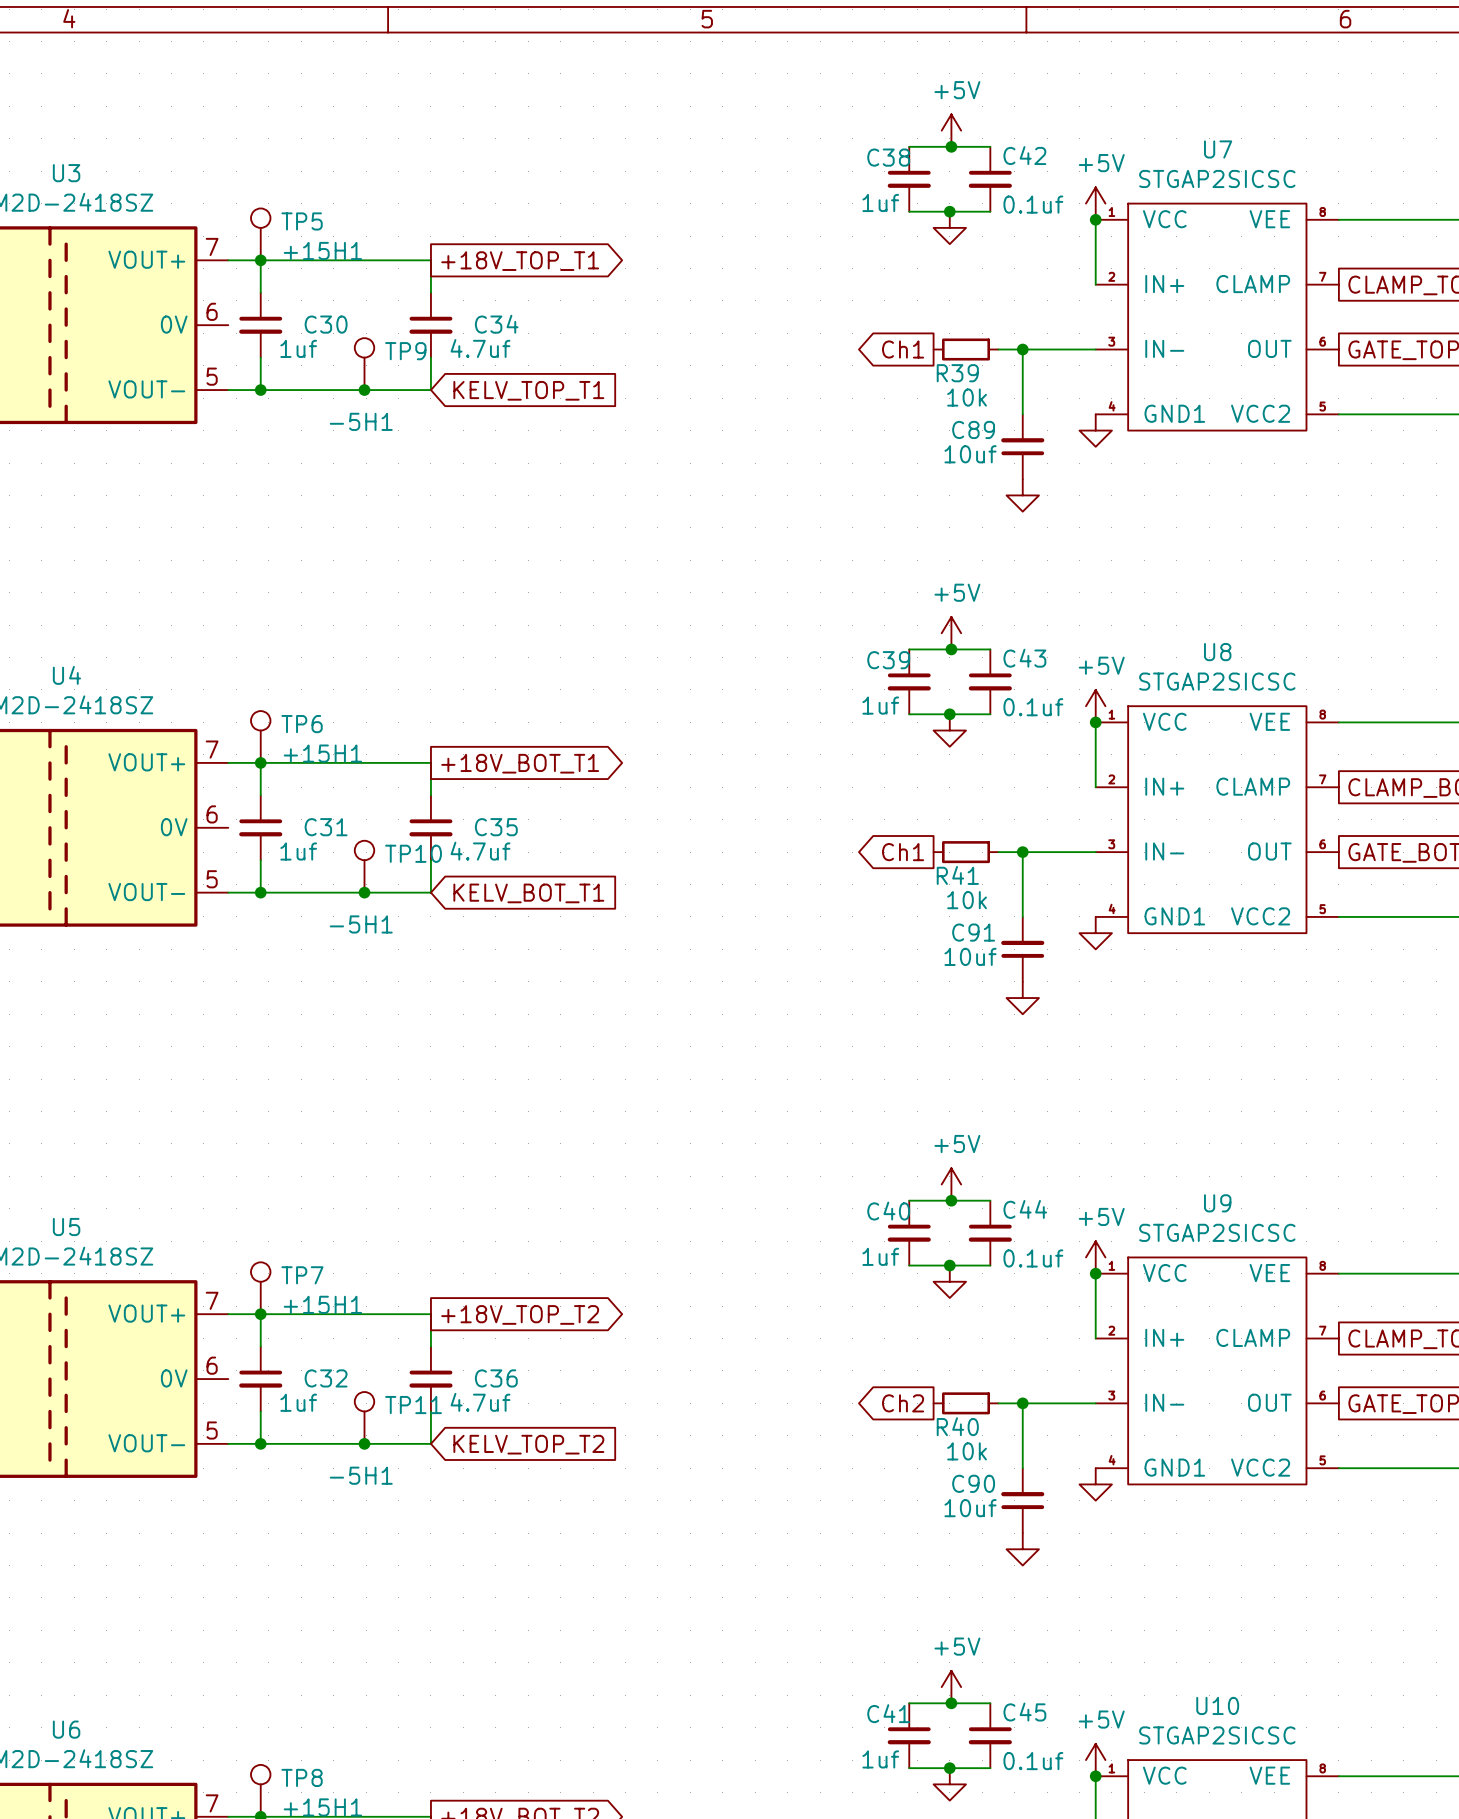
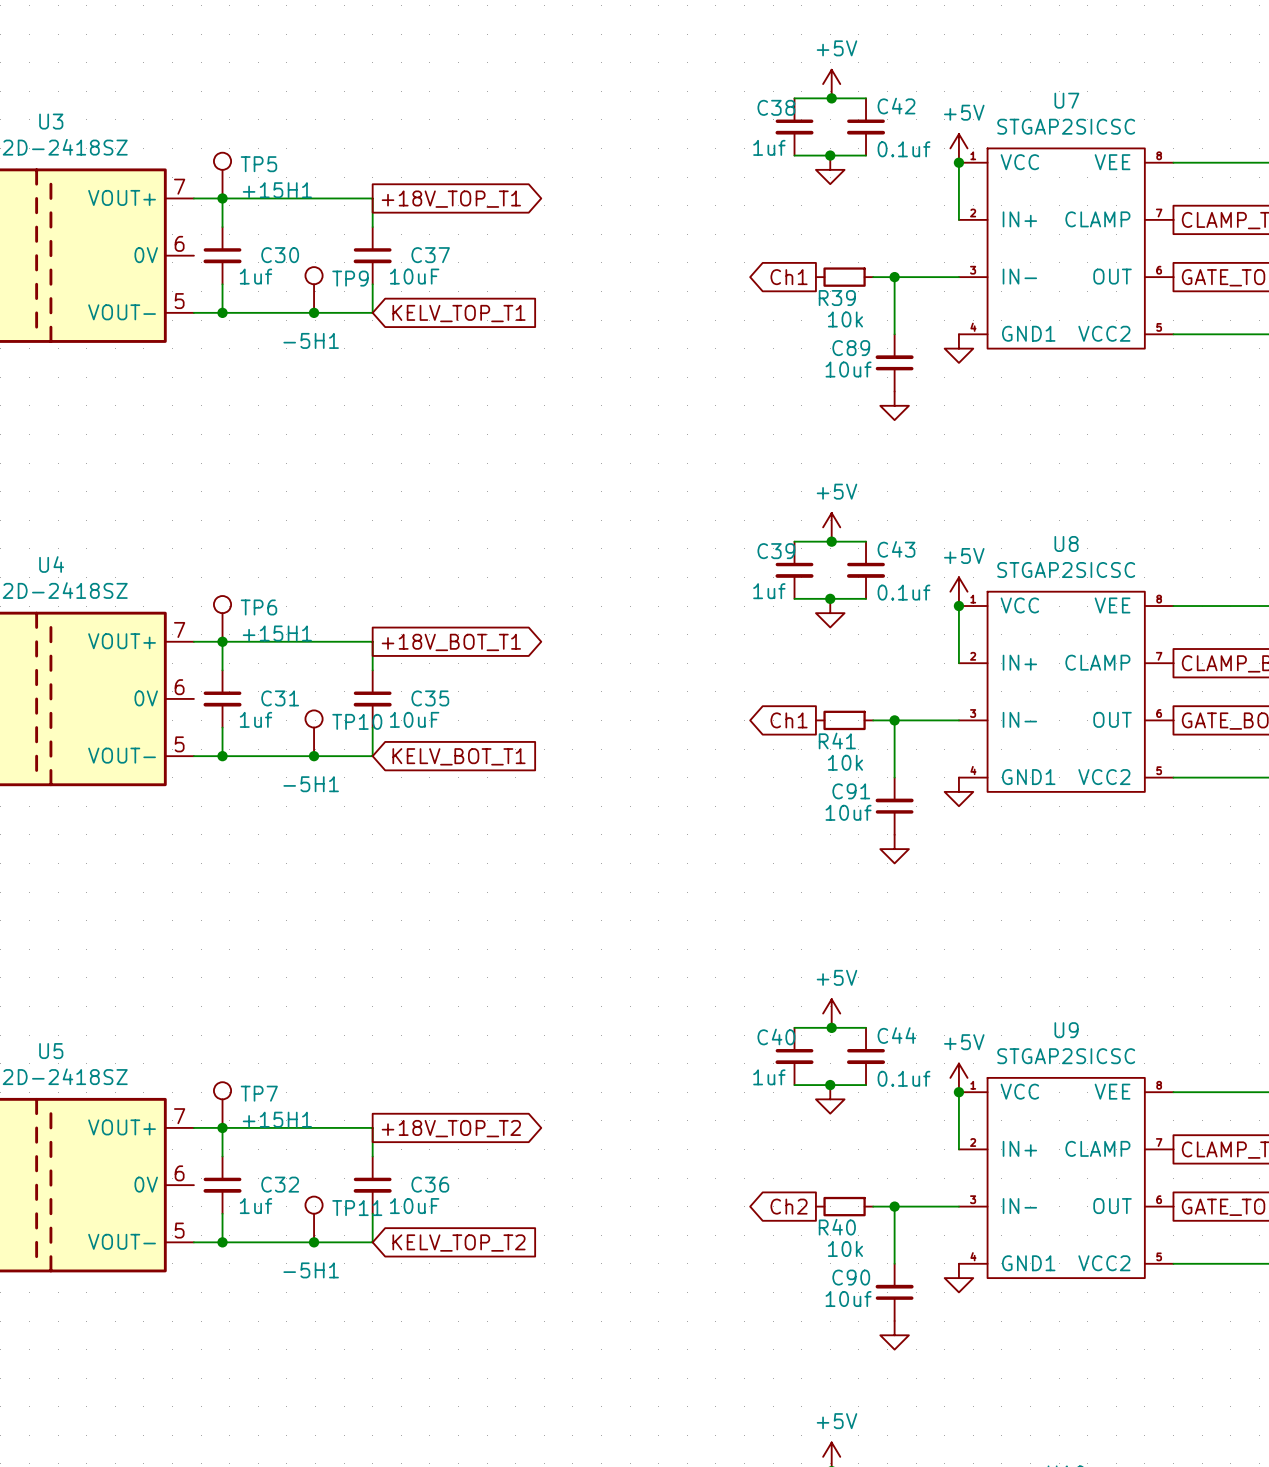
C34 name: C34 (496, 324) -> C37 (430, 255)
C34 value: 4.7uf (480, 348) -> 10uF (414, 276)
C35 value: 4.7uf (480, 851) -> 10uF (414, 719)
C36 value: 4.7uf (480, 1402) -> 10uF (414, 1206)

